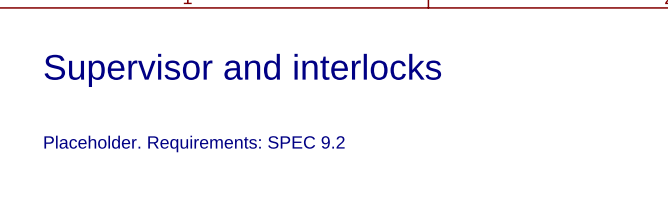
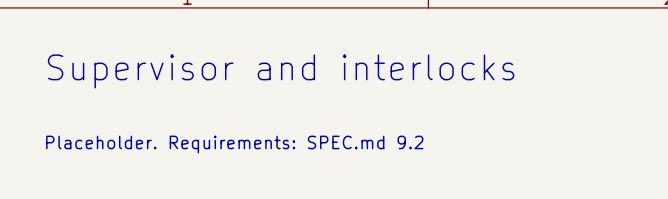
text: Placeholder. Requirements: SPEC 9.2 (194, 143) -> Placeholder. Requirements: SPEC.md 9.2 (234, 144)

